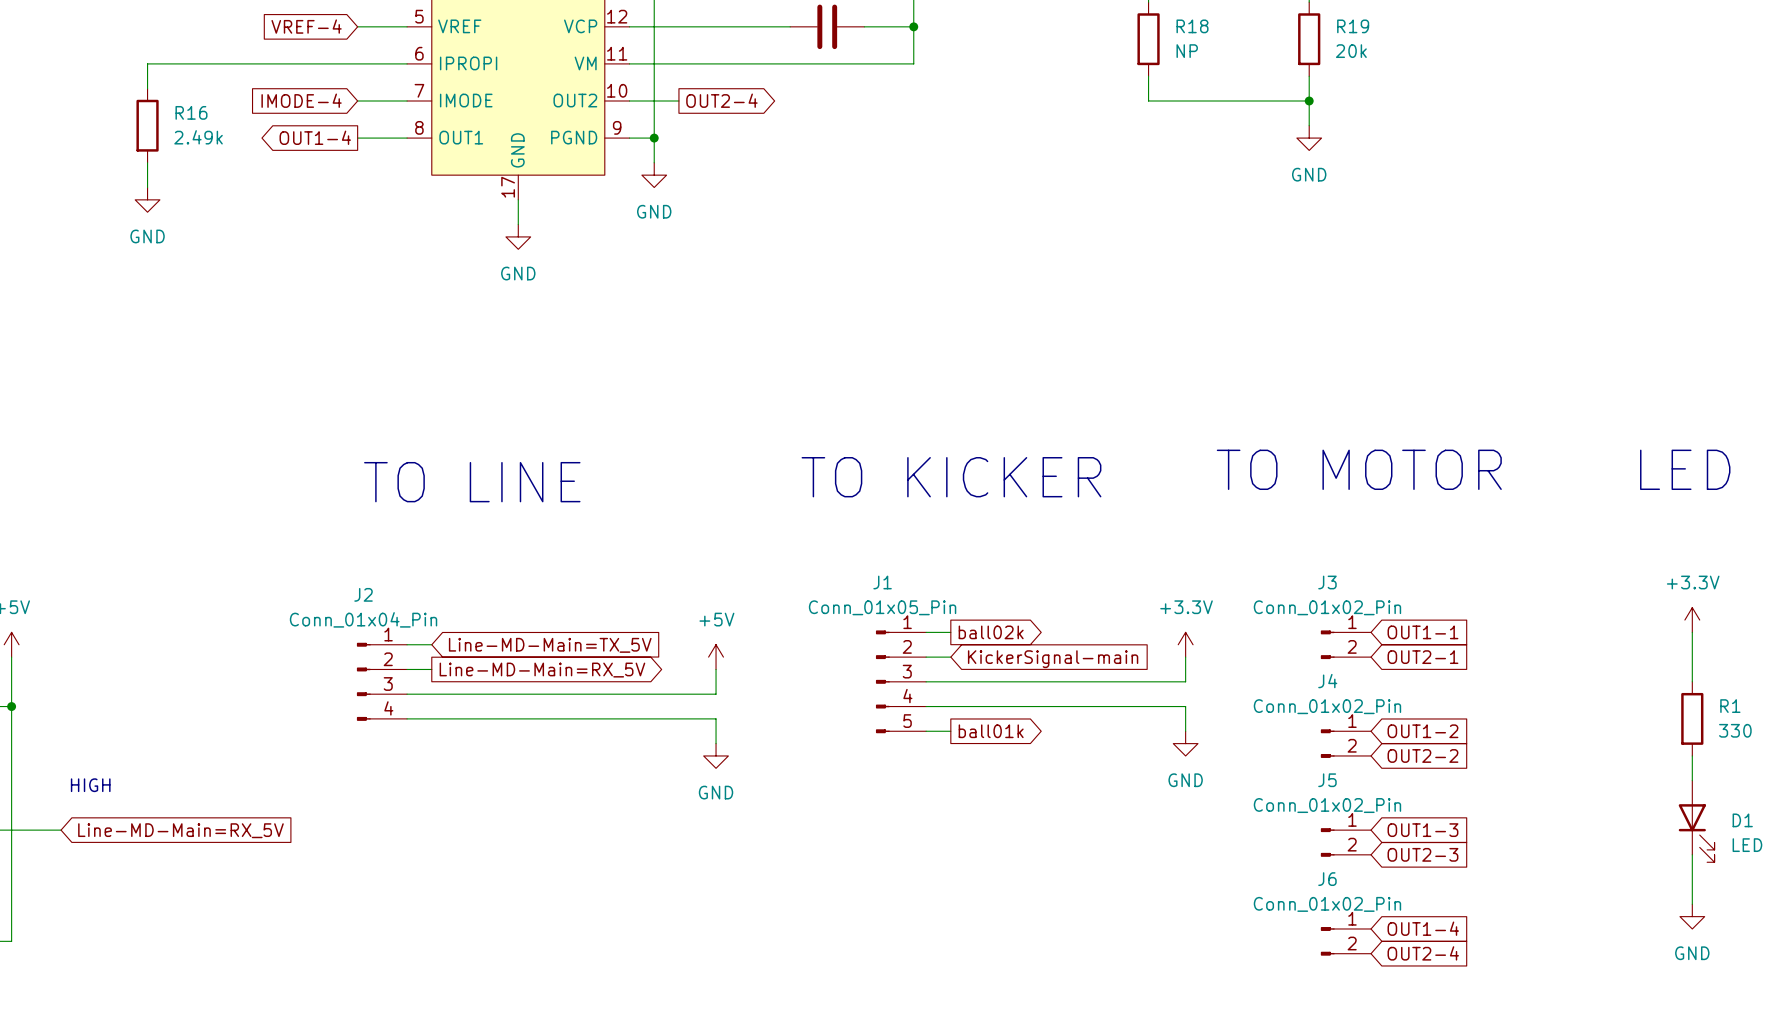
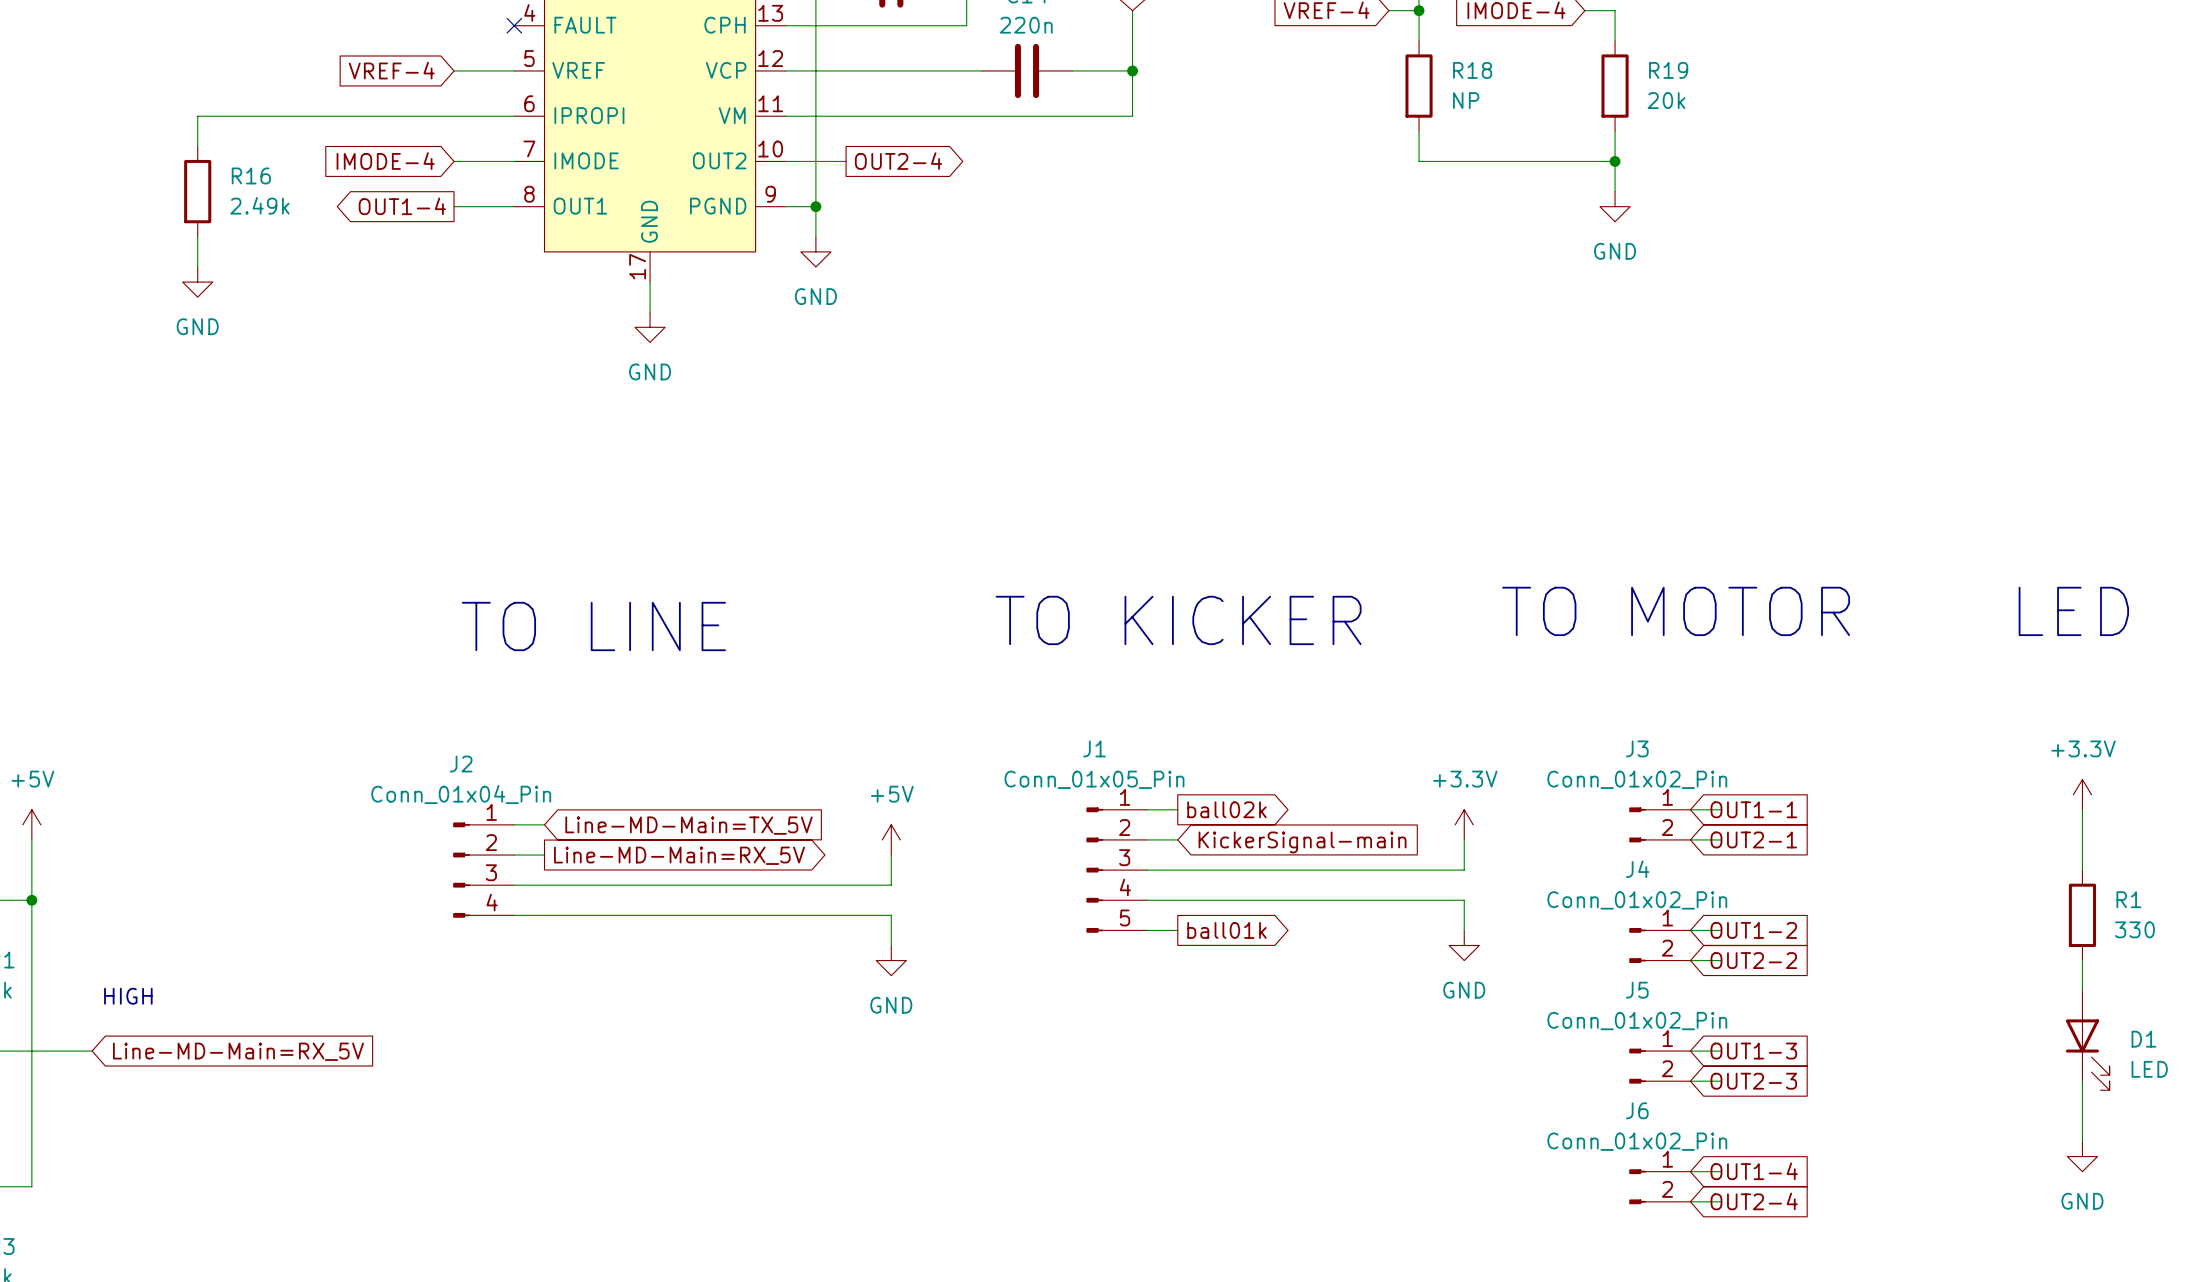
wire: none -> (1690, 809) (1720, 809)
wire: none -> (1690, 839) (1720, 839)
wire: none -> (1690, 930) (1720, 930)
wire: none -> (1690, 960) (1720, 960)
wire: none -> (1690, 1051) (1720, 1051)
wire: none -> (1690, 1081) (1720, 1081)
wire: none -> (1690, 1171) (1720, 1171)
wire: none -> (1690, 1201) (1720, 1201)

